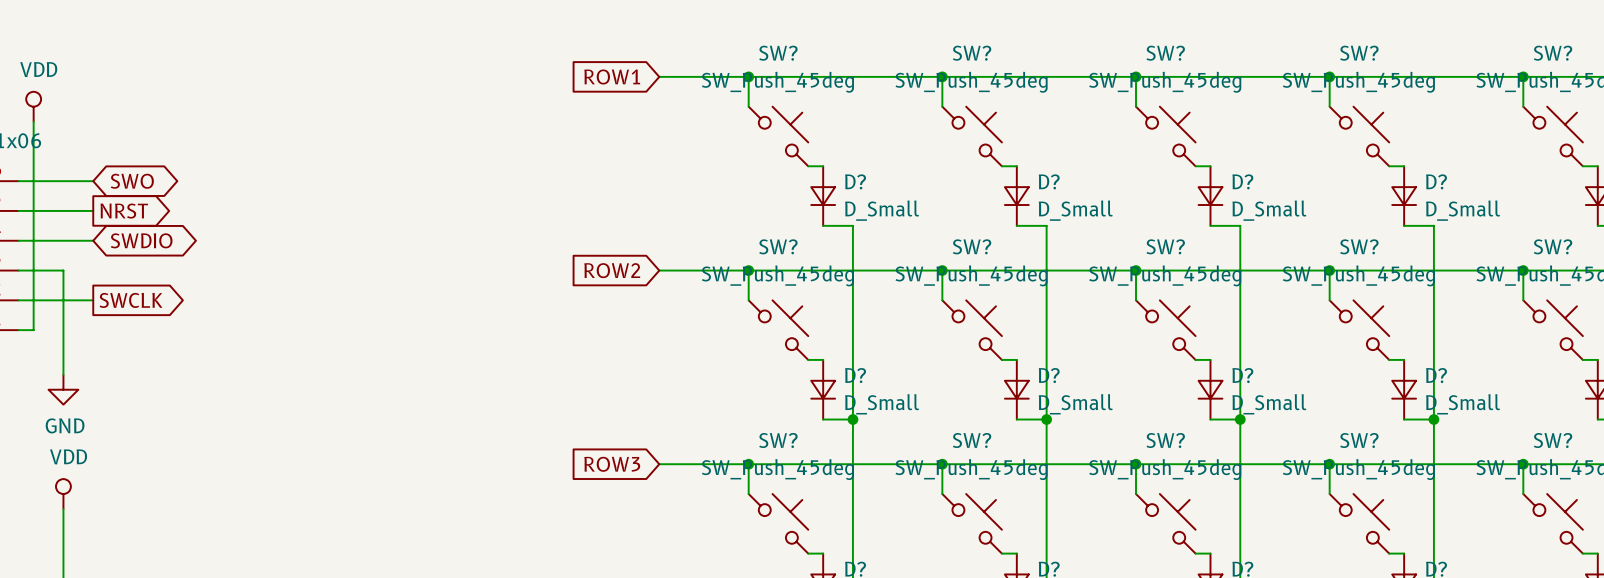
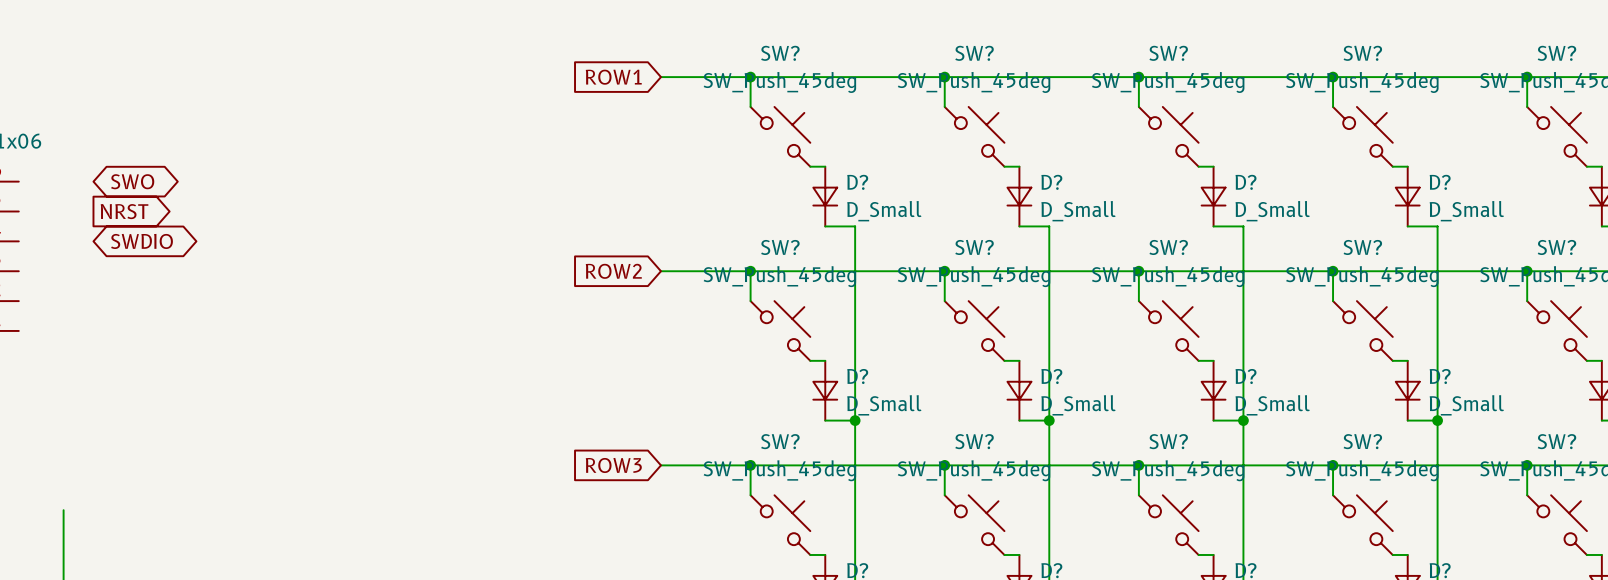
power symbol: VDD (33, 106) -> none
wire: (33, 121) (33, 330) (18, 330) -> none
wire: (18, 181) (93, 181) -> none
wire: (18, 210) (93, 210) -> none
wire: (18, 240) (93, 240) -> none
wire: (18, 270) (63, 270) (63, 374) -> none
wire: (18, 300) (93, 300) -> none
global label: SWCLK (131, 300) -> none
power symbol: GND (63, 389) -> none
power symbol: VDD (63, 494) -> none

